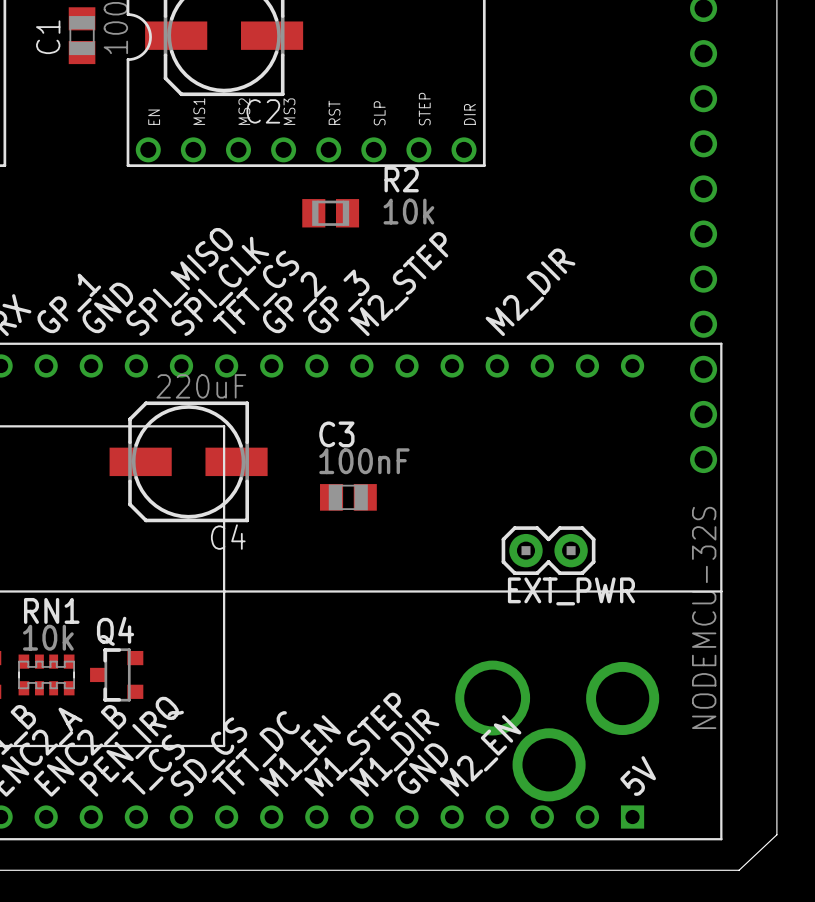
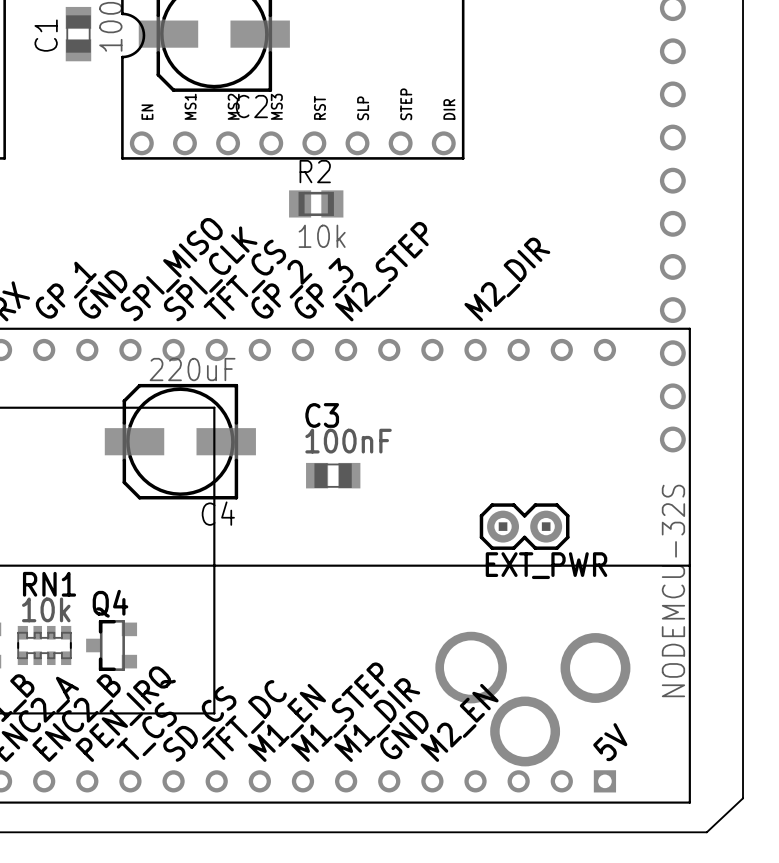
R2 name position: R2 (401, 179) -> R2 (315, 171)
R2 value position: 10k (408, 211) -> 10k (322, 236)

